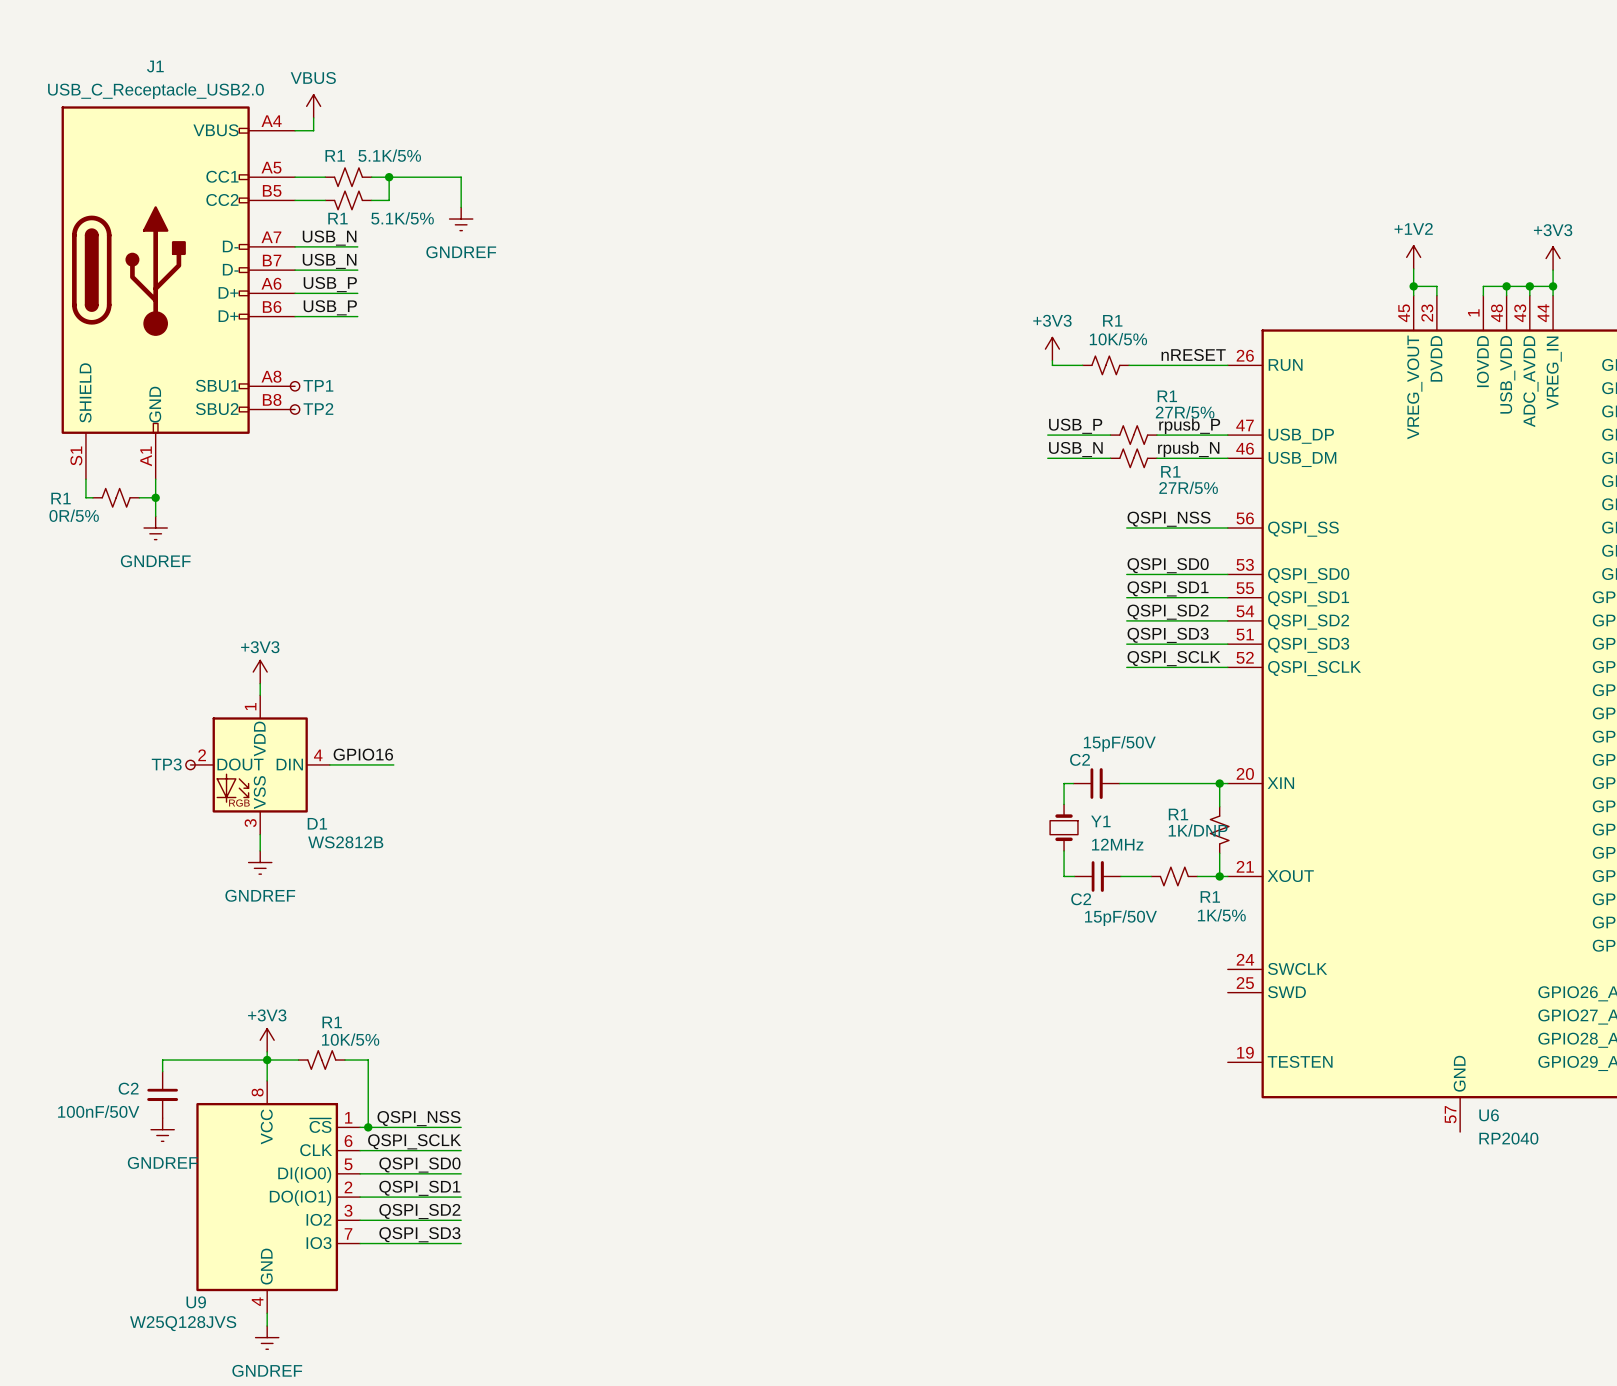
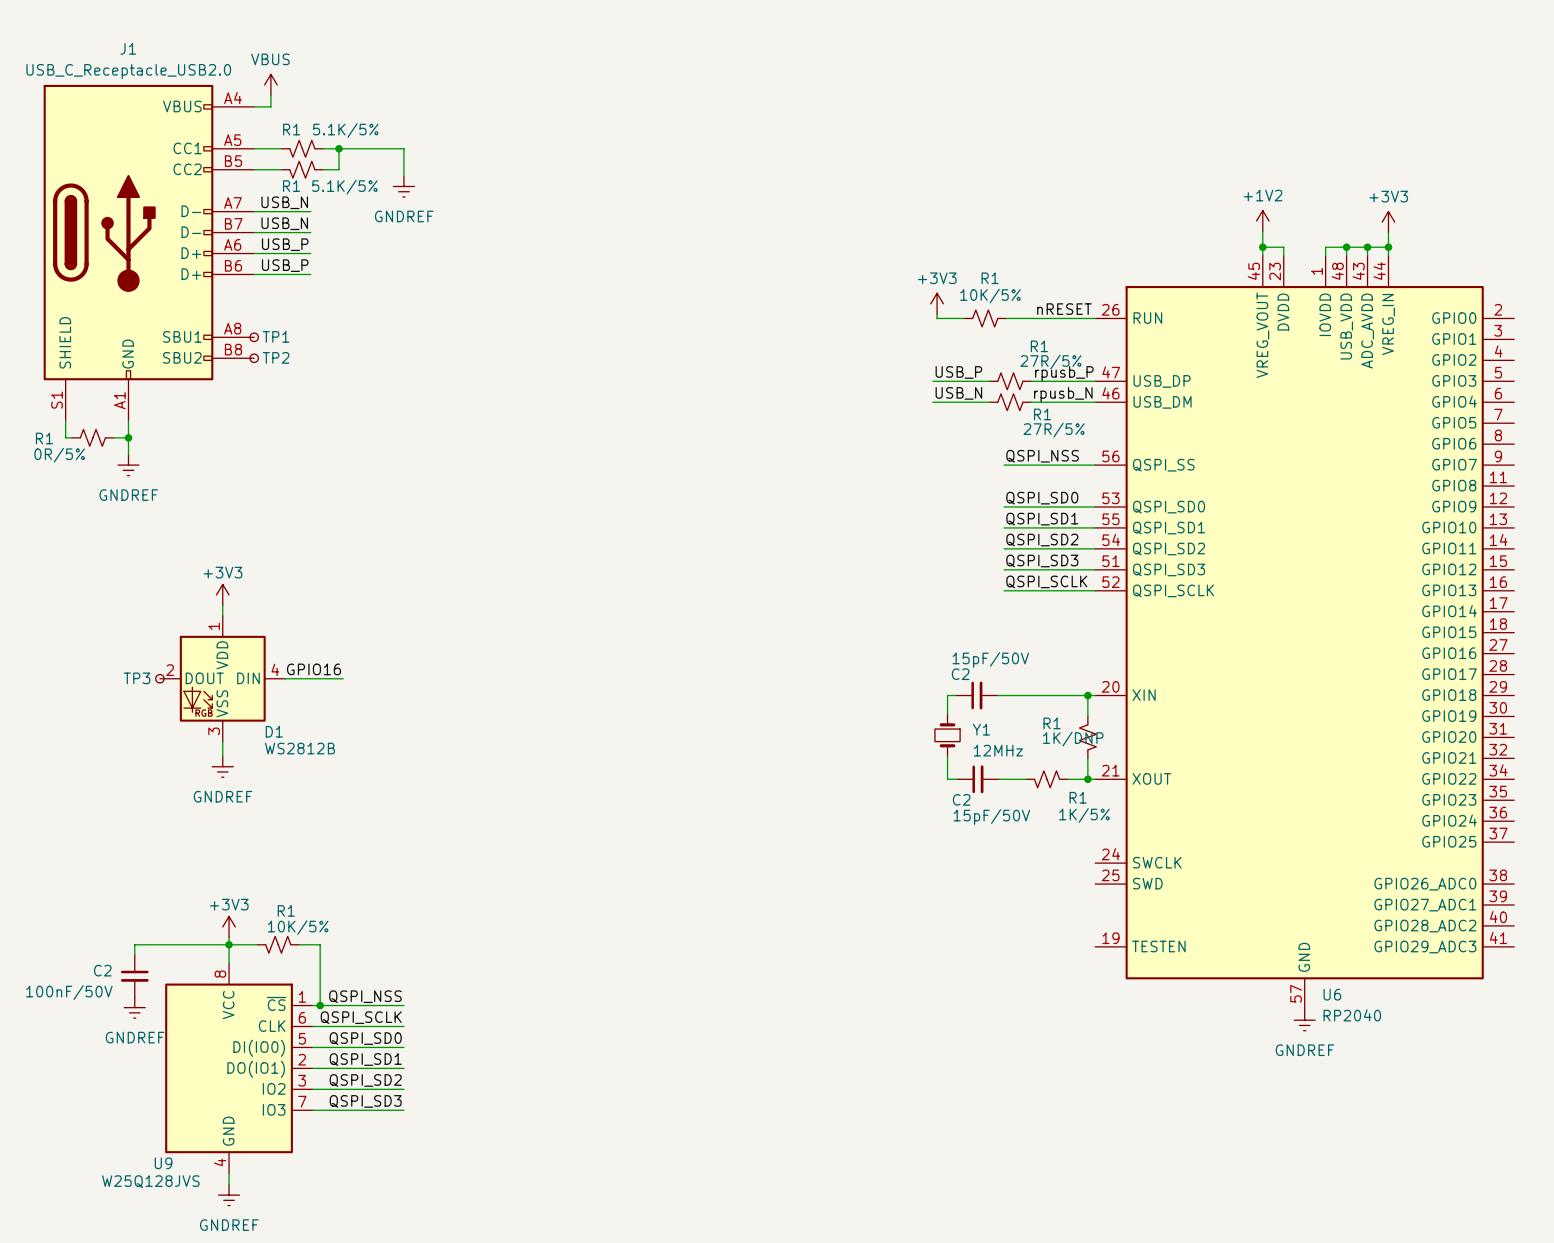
power symbol: none -> GNDREF (1304, 1020)

